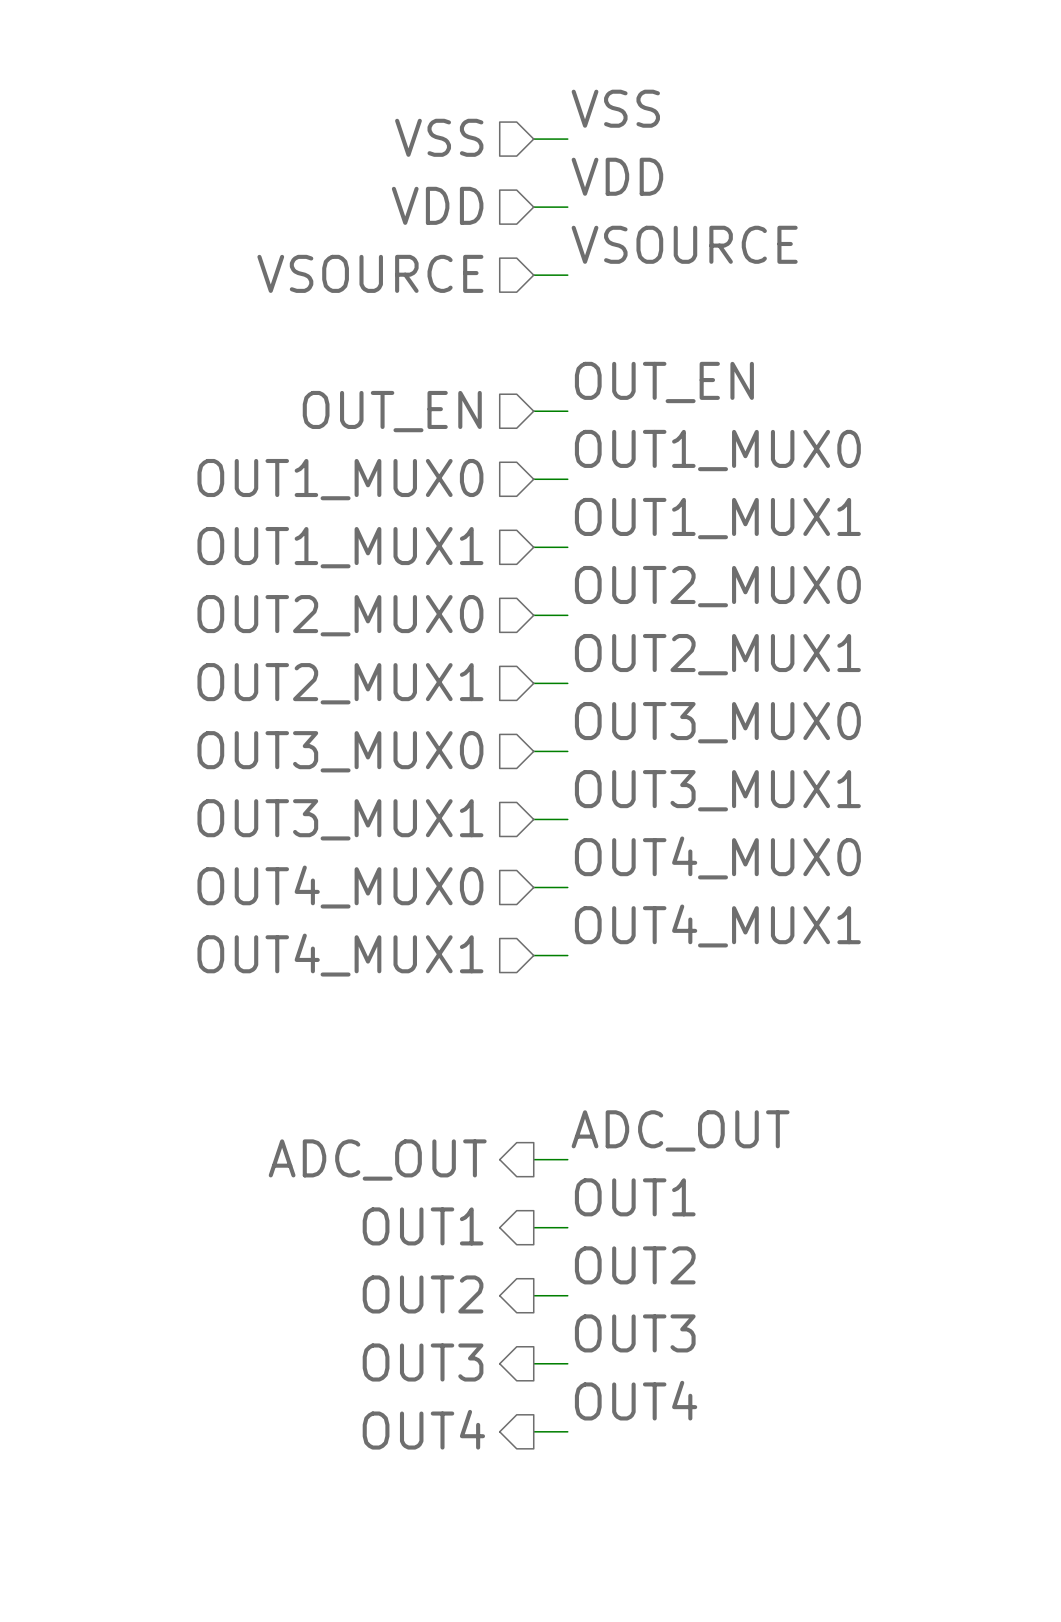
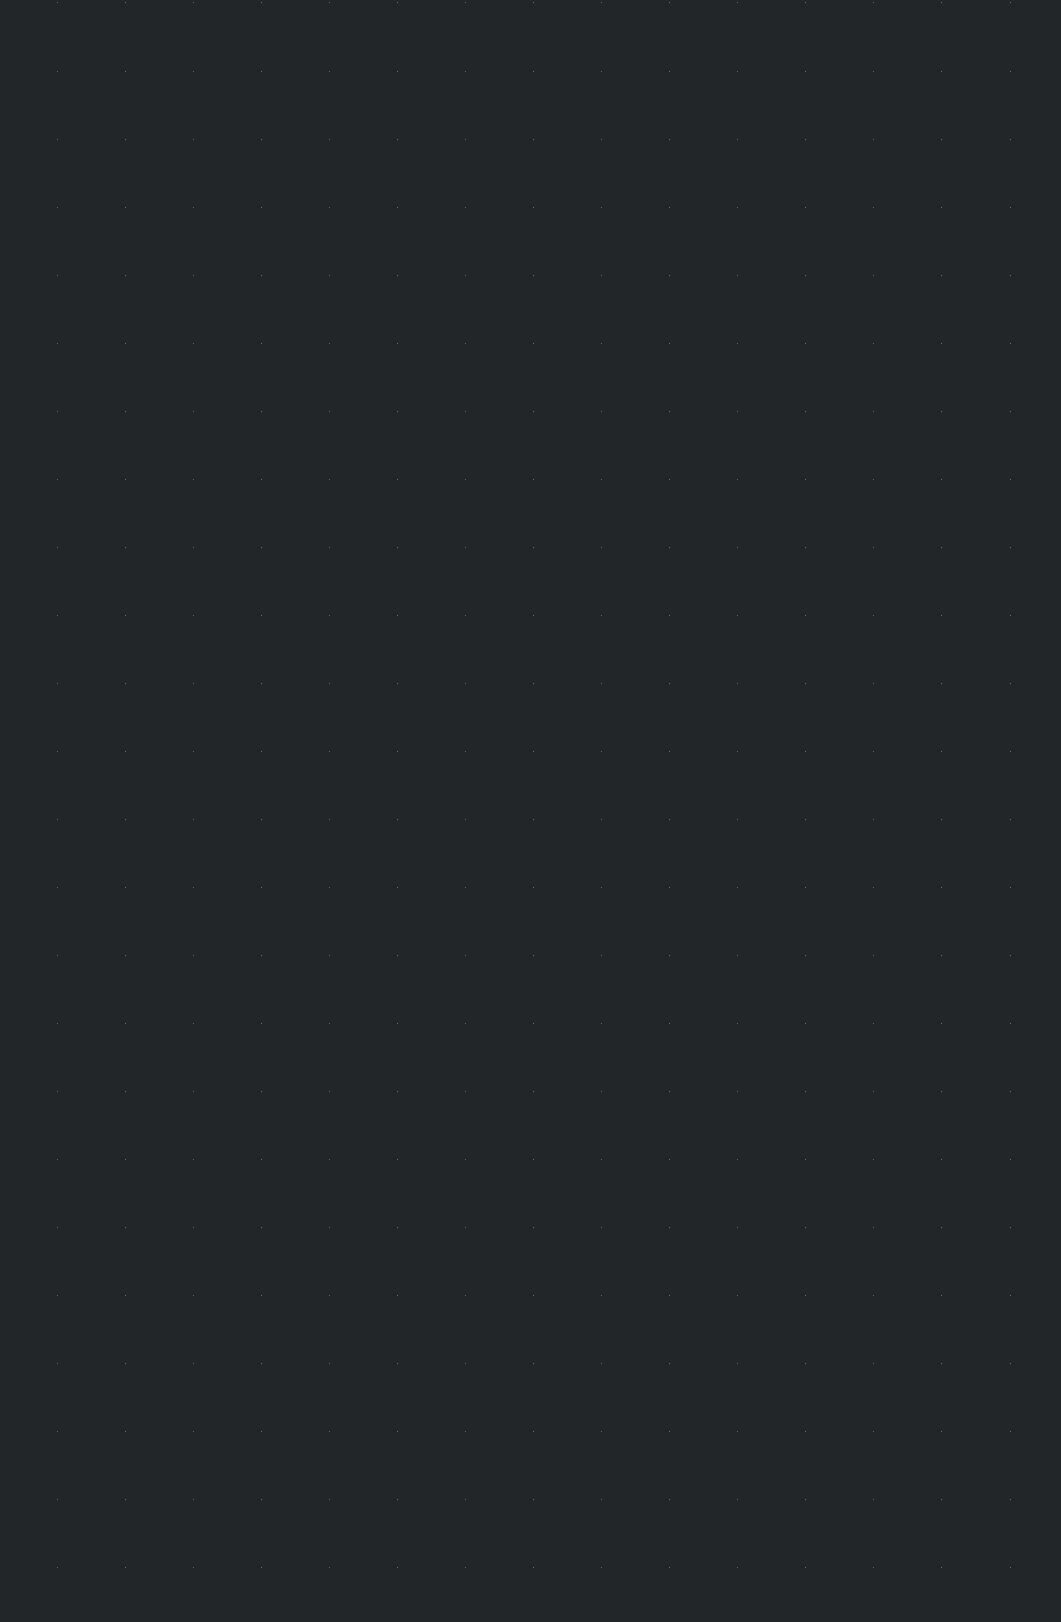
label: VSS (615, 108) -> none
hierarchical label: VSS (439, 137) -> none
wire: (533, 139) (567, 139) -> none
label: VDD (617, 176) -> none
hierarchical label: VDD (437, 205) -> none
wire: (533, 207) (567, 207) -> none
label: VSOURCE (684, 244) -> none
hierarchical label: VSOURCE (370, 273) -> none
wire: (533, 275) (567, 275) -> none
label: OUT_EN (664, 382) -> none
hierarchical label: OUT_EN (392, 411) -> none
wire: (533, 411) (567, 411) -> none
label: OUT1_MUX0 (717, 450) -> none
hierarchical label: OUT1_MUX0 (340, 479) -> none
wire: (533, 479) (567, 479) -> none
label: OUT1_MUX1 (717, 518) -> none
hierarchical label: OUT1_MUX1 (340, 547) -> none
wire: (533, 547) (567, 547) -> none
label: OUT2_MUX0 (717, 586) -> none
hierarchical label: OUT2_MUX0 (340, 615) -> none
wire: (533, 615) (567, 615) -> none
label: OUT2_MUX1 (717, 654) -> none
hierarchical label: OUT2_MUX1 (340, 683) -> none
wire: (533, 683) (567, 683) -> none
label: OUT3_MUX0 (717, 722) -> none
hierarchical label: OUT3_MUX0 (340, 751) -> none
wire: (533, 751) (567, 751) -> none
label: OUT3_MUX1 (717, 790) -> none
hierarchical label: OUT3_MUX1 (340, 819) -> none
wire: (533, 819) (567, 819) -> none
label: OUT4_MUX0 (717, 857) -> none
hierarchical label: OUT4_MUX0 (340, 887) -> none
wire: (533, 887) (567, 887) -> none
label: OUT4_MUX1 (717, 925) -> none
hierarchical label: OUT4_MUX1 (340, 955) -> none
wire: (533, 955) (567, 955) -> none
label: ADC_OUT (680, 1130) -> none
wire: (533, 1159) (567, 1159) -> none
hierarchical label: ADC_OUT (377, 1160) -> none
label: OUT1 (635, 1197) -> none
hierarchical label: OUT1 (423, 1226) -> none
wire: (533, 1227) (567, 1227) -> none
label: OUT2 (635, 1265) -> none
hierarchical label: OUT2 (423, 1294) -> none
wire: (533, 1295) (567, 1295) -> none
label: OUT3 (635, 1333) -> none
hierarchical label: OUT3 (423, 1362) -> none
wire: (533, 1363) (567, 1363) -> none
label: OUT4 (636, 1400) -> none
hierarchical label: OUT4 (423, 1429) -> none
wire: (533, 1431) (567, 1431) -> none

